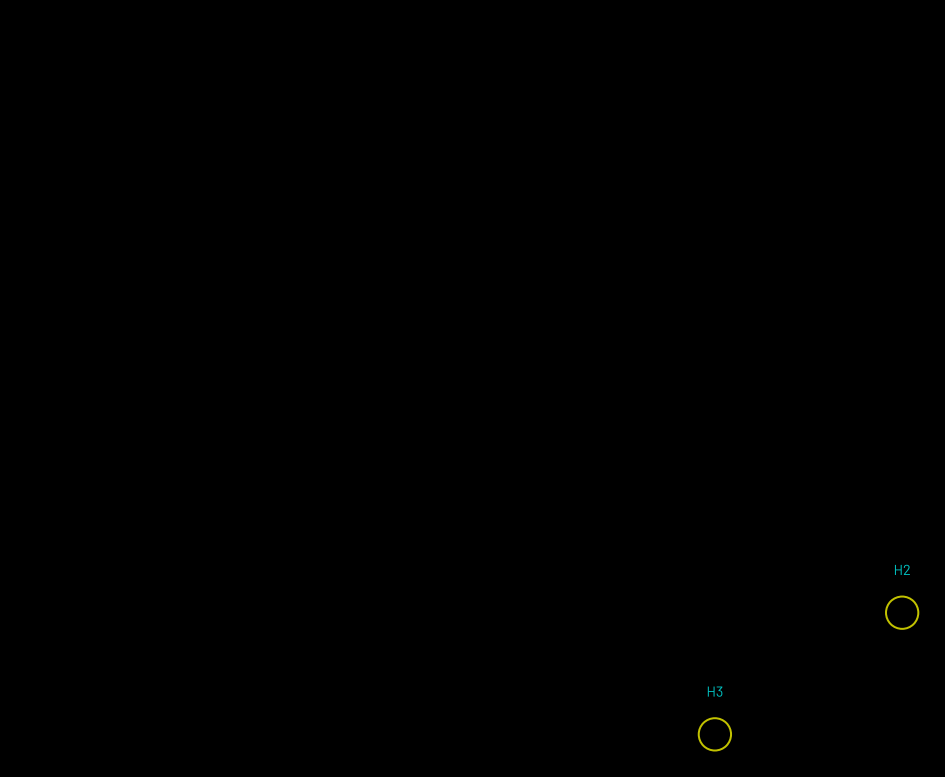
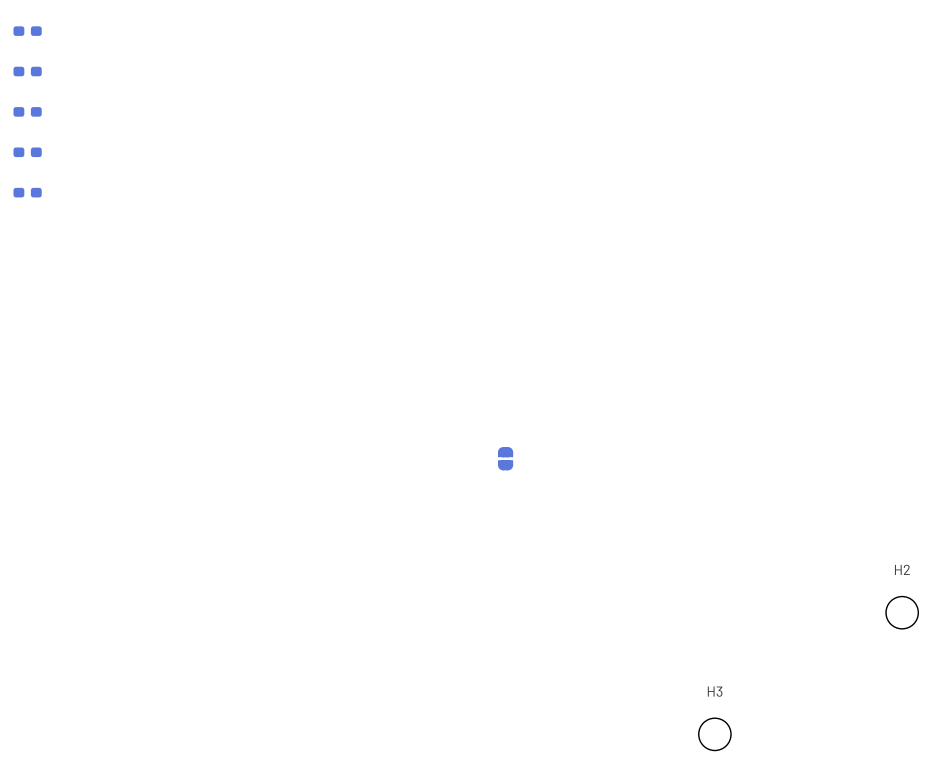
part: none -> (27, 31)
part: none -> (27, 71)
part: none -> (27, 111)
part: none -> (27, 152)
part: none -> (27, 192)
part: none -> (505, 458)

